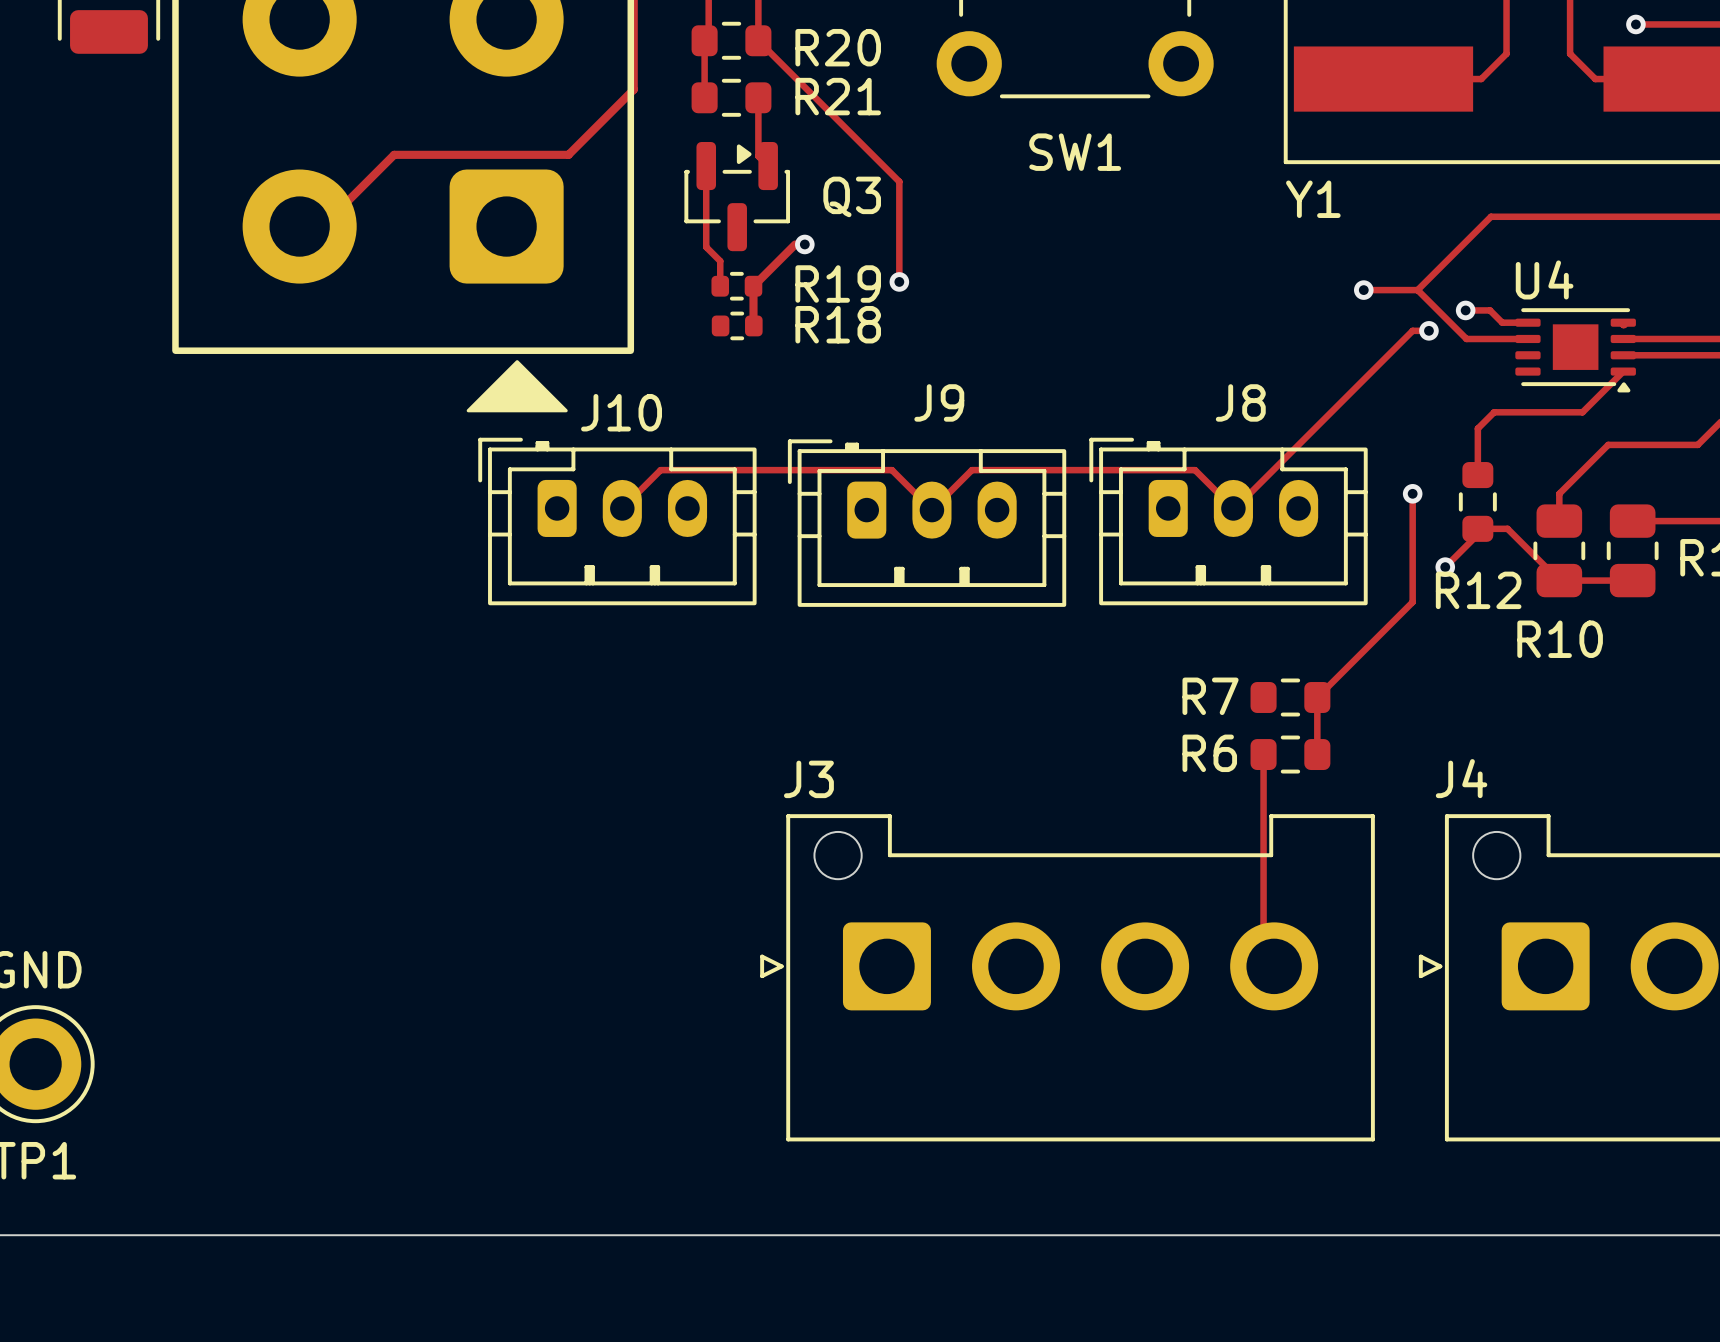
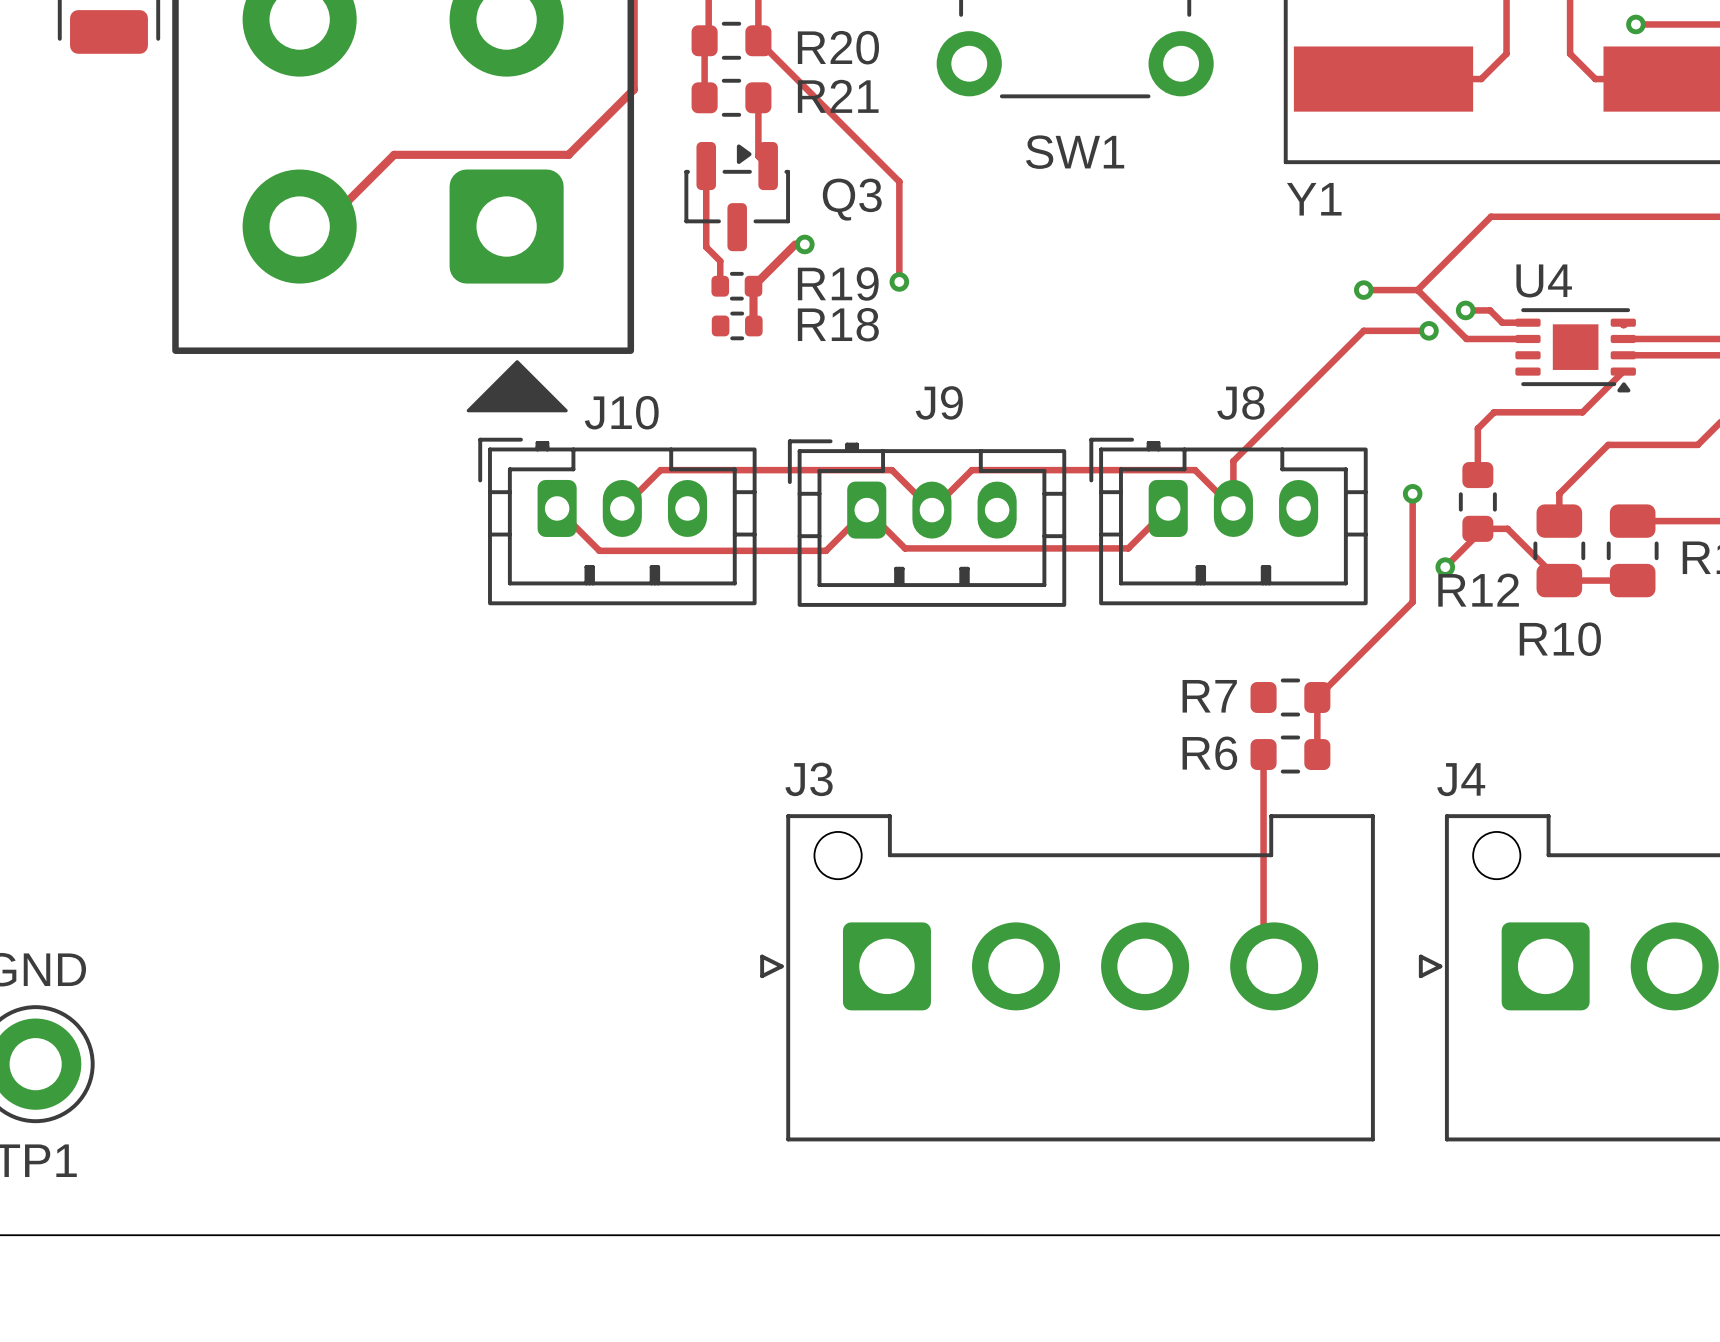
track: (1412, 330) (1233, 508) -> (1412, 330) (1363, 330) (1233, 461) (1233, 508)
track: none -> (557, 508) (599, 550) (826, 550) (866, 510) (905, 548) (1128, 548) (1168, 508)

